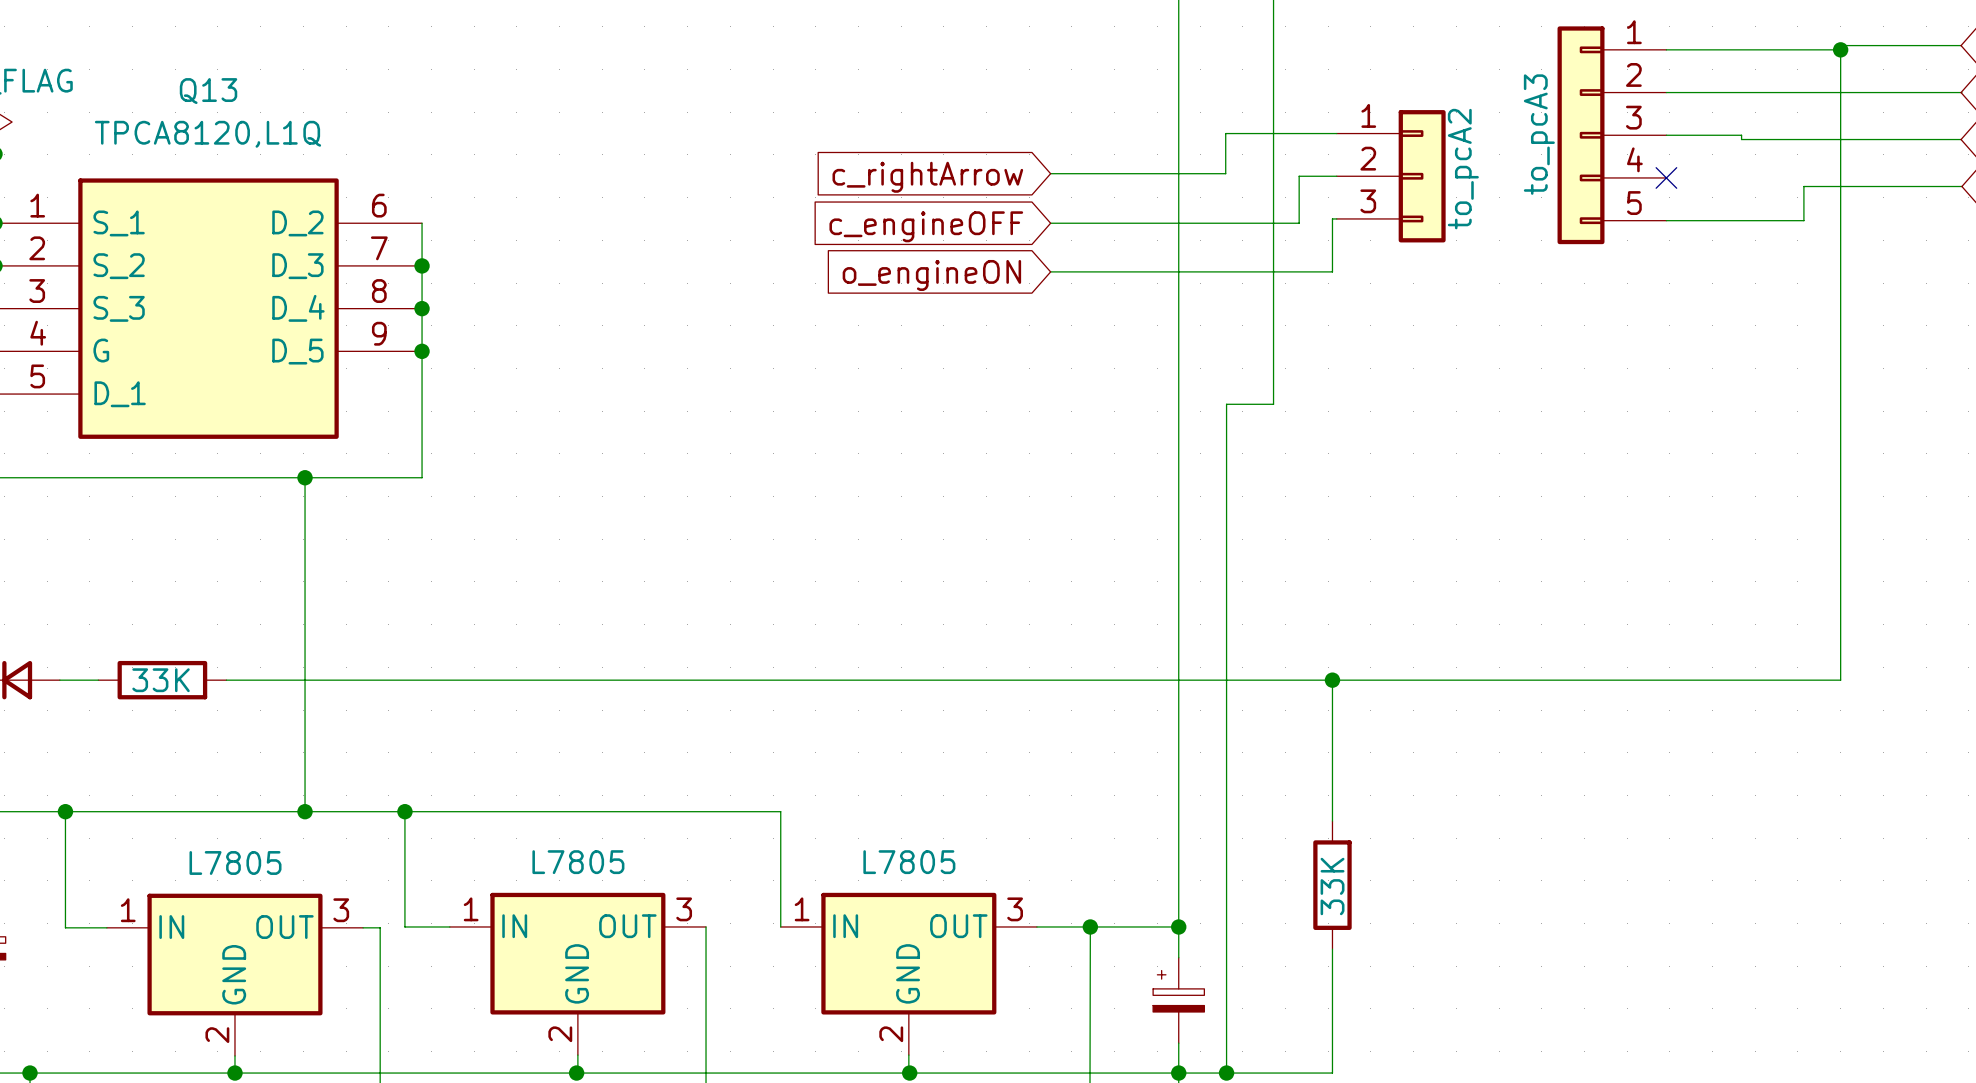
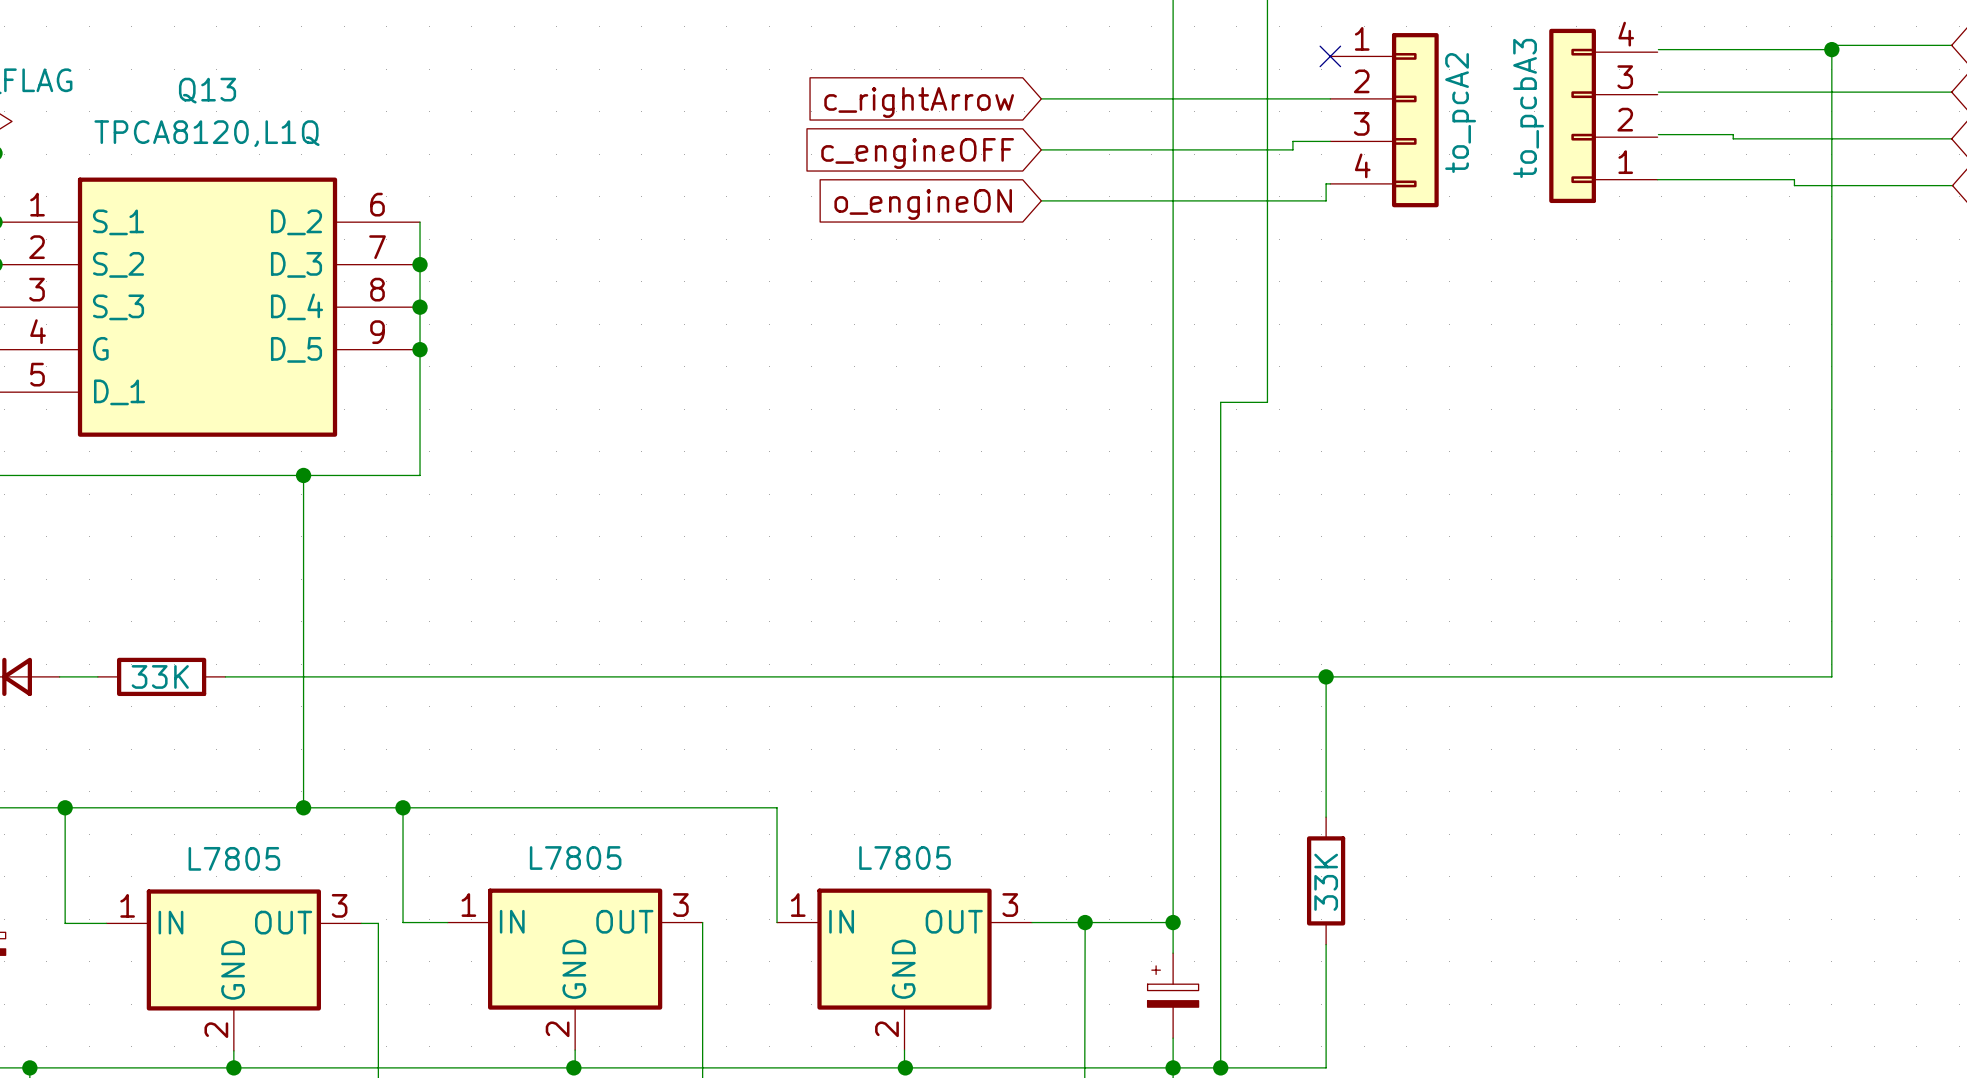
no-connect mark: none -> (1330, 56)
wire: none -> (1041, 98) (1330, 98)
to_pcA2 symbol: [1336, 110, 1446, 243] -> [1330, 33, 1439, 208]
to_pcbA3: none -> (1603, 115)
wire: (1336, 133) (1225, 133) (1225, 173) (1050, 173) -> none
to_pcA3: (1611, 135) -> none
wire: none -> (1330, 141) (1292, 141) (1292, 149) (1041, 149)
wire: (1336, 176) (1299, 176) (1299, 223) (1050, 223) -> none
global label position: c_rightArrow (927, 177) -> c_rightArrow (919, 102)
no-connect mark: (1666, 177) -> none
wire: none -> (1330, 183) (1326, 183) (1326, 200) (1041, 200)
wire: (1803, 186) (1803, 220) (1666, 220) -> (1795, 185) (1794, 179) (1657, 179)
wire: (1336, 218) (1332, 218) (1332, 271) (1050, 271) -> none
global label position: c_engineOFF (926, 226) -> c_engineOFF (917, 153)
global label position: o_engineON (931, 275) -> o_engineON (923, 204)

